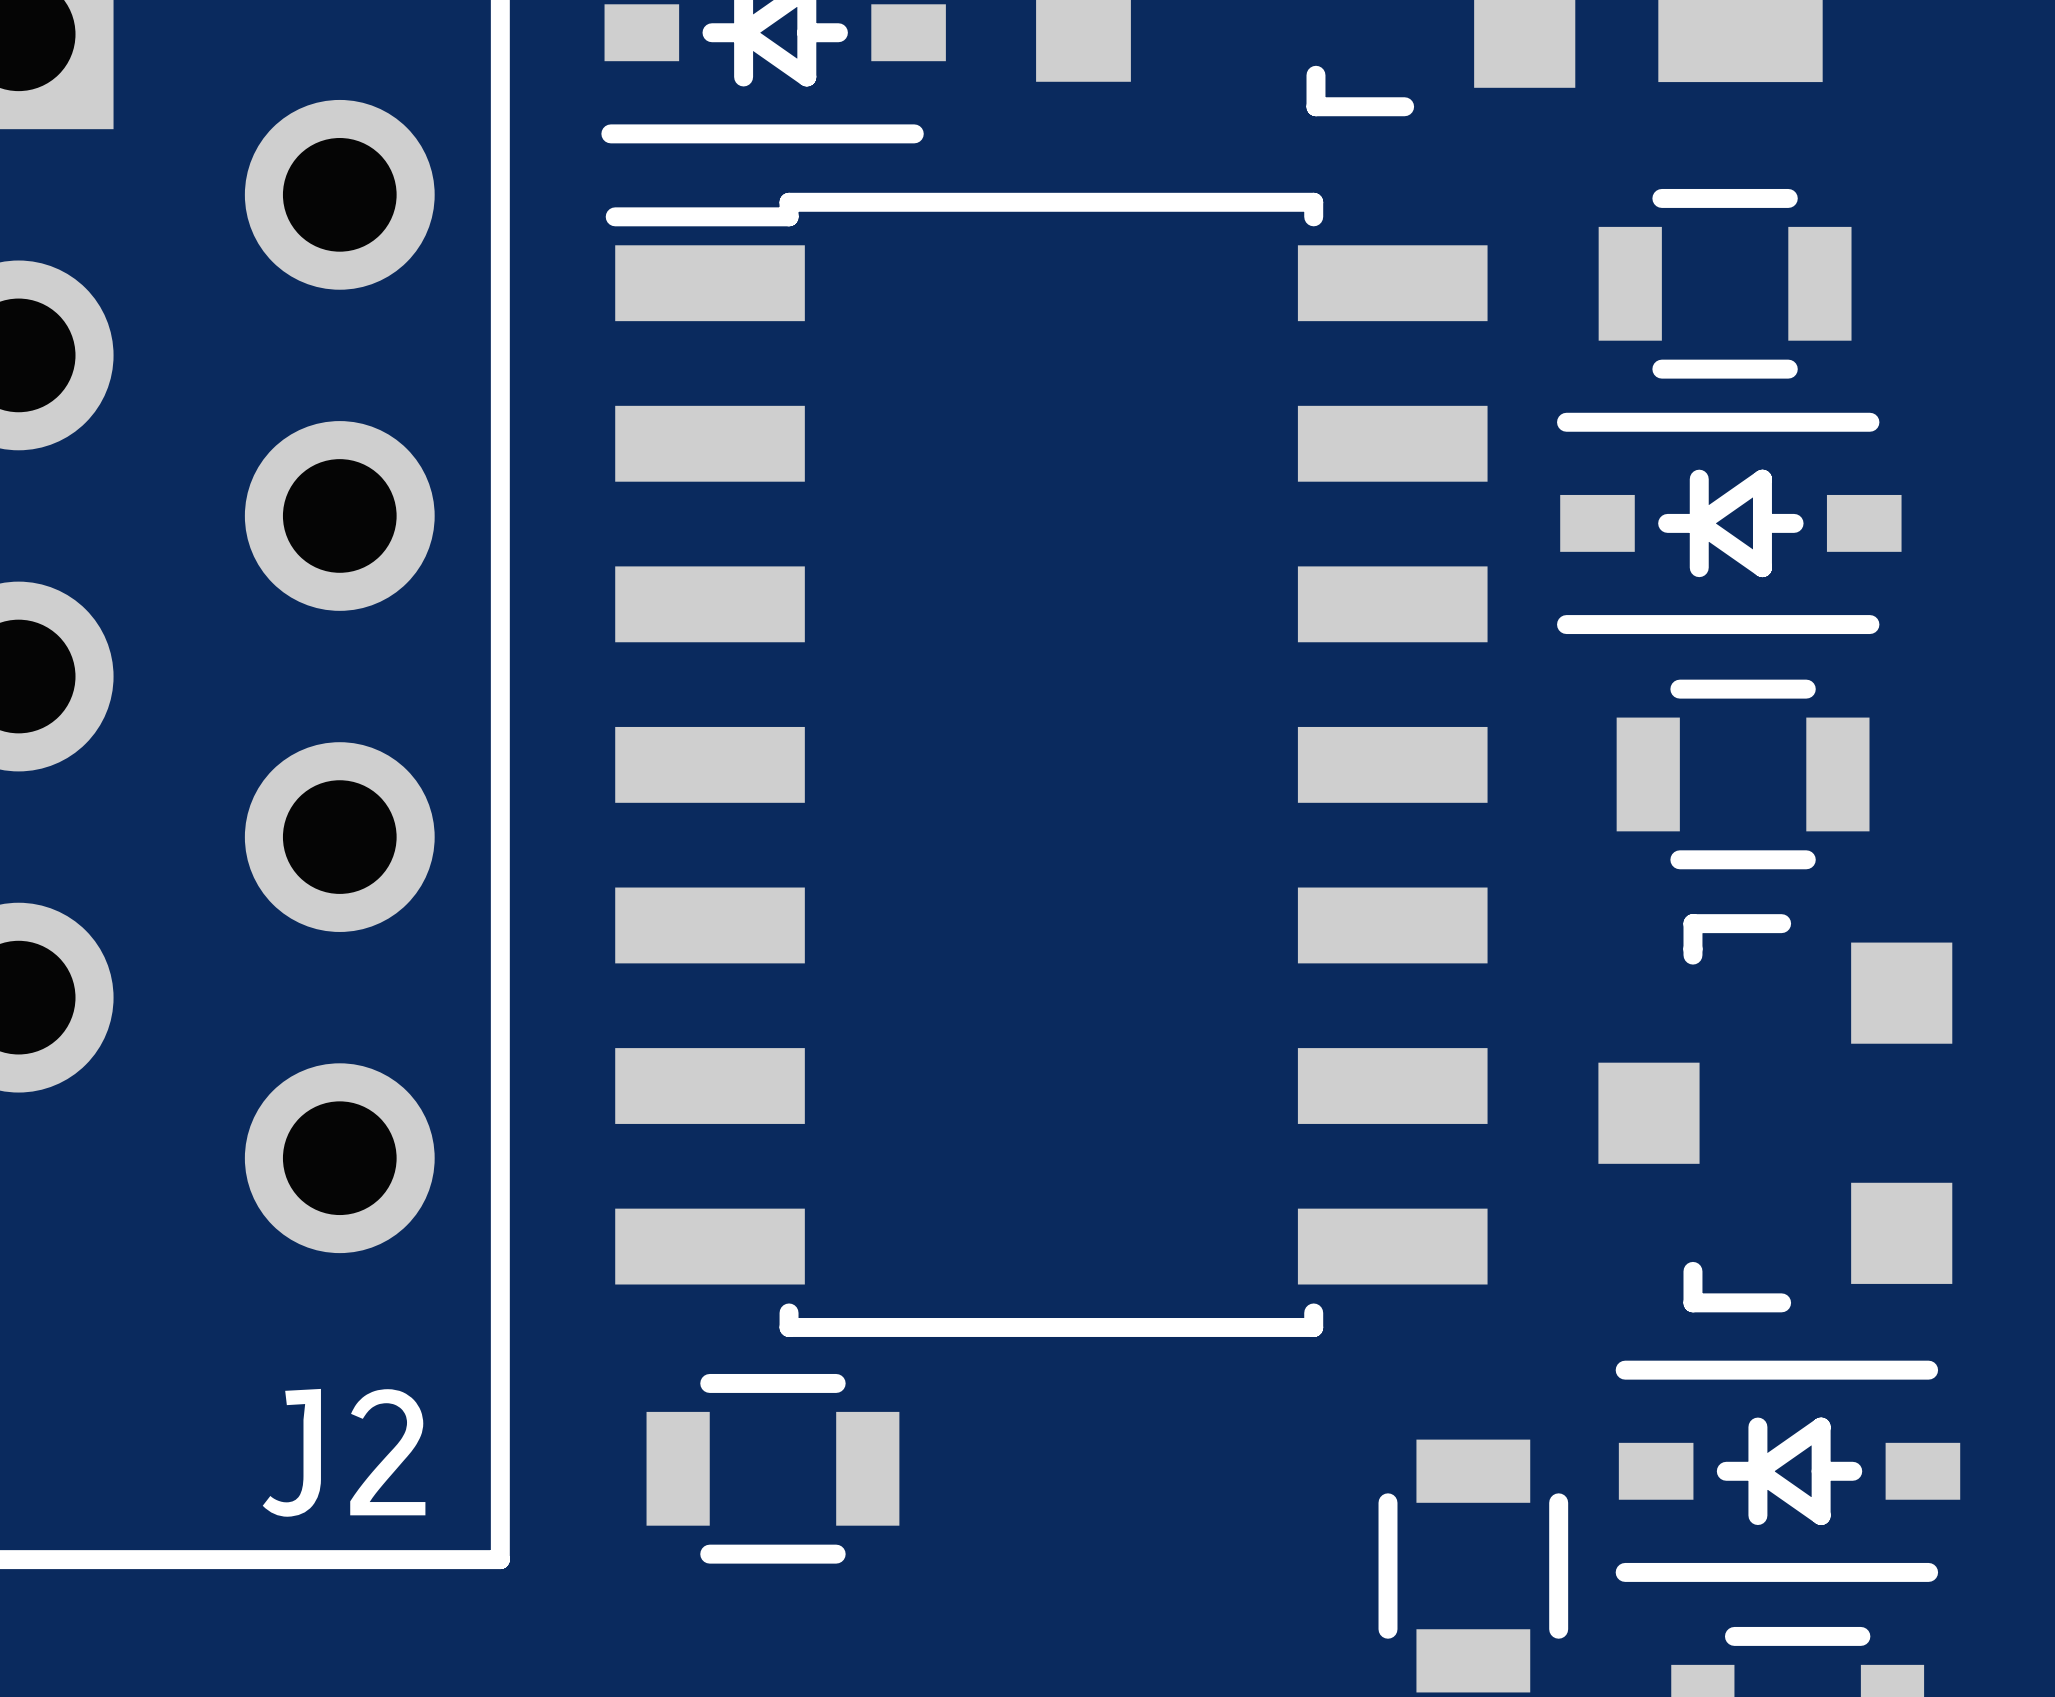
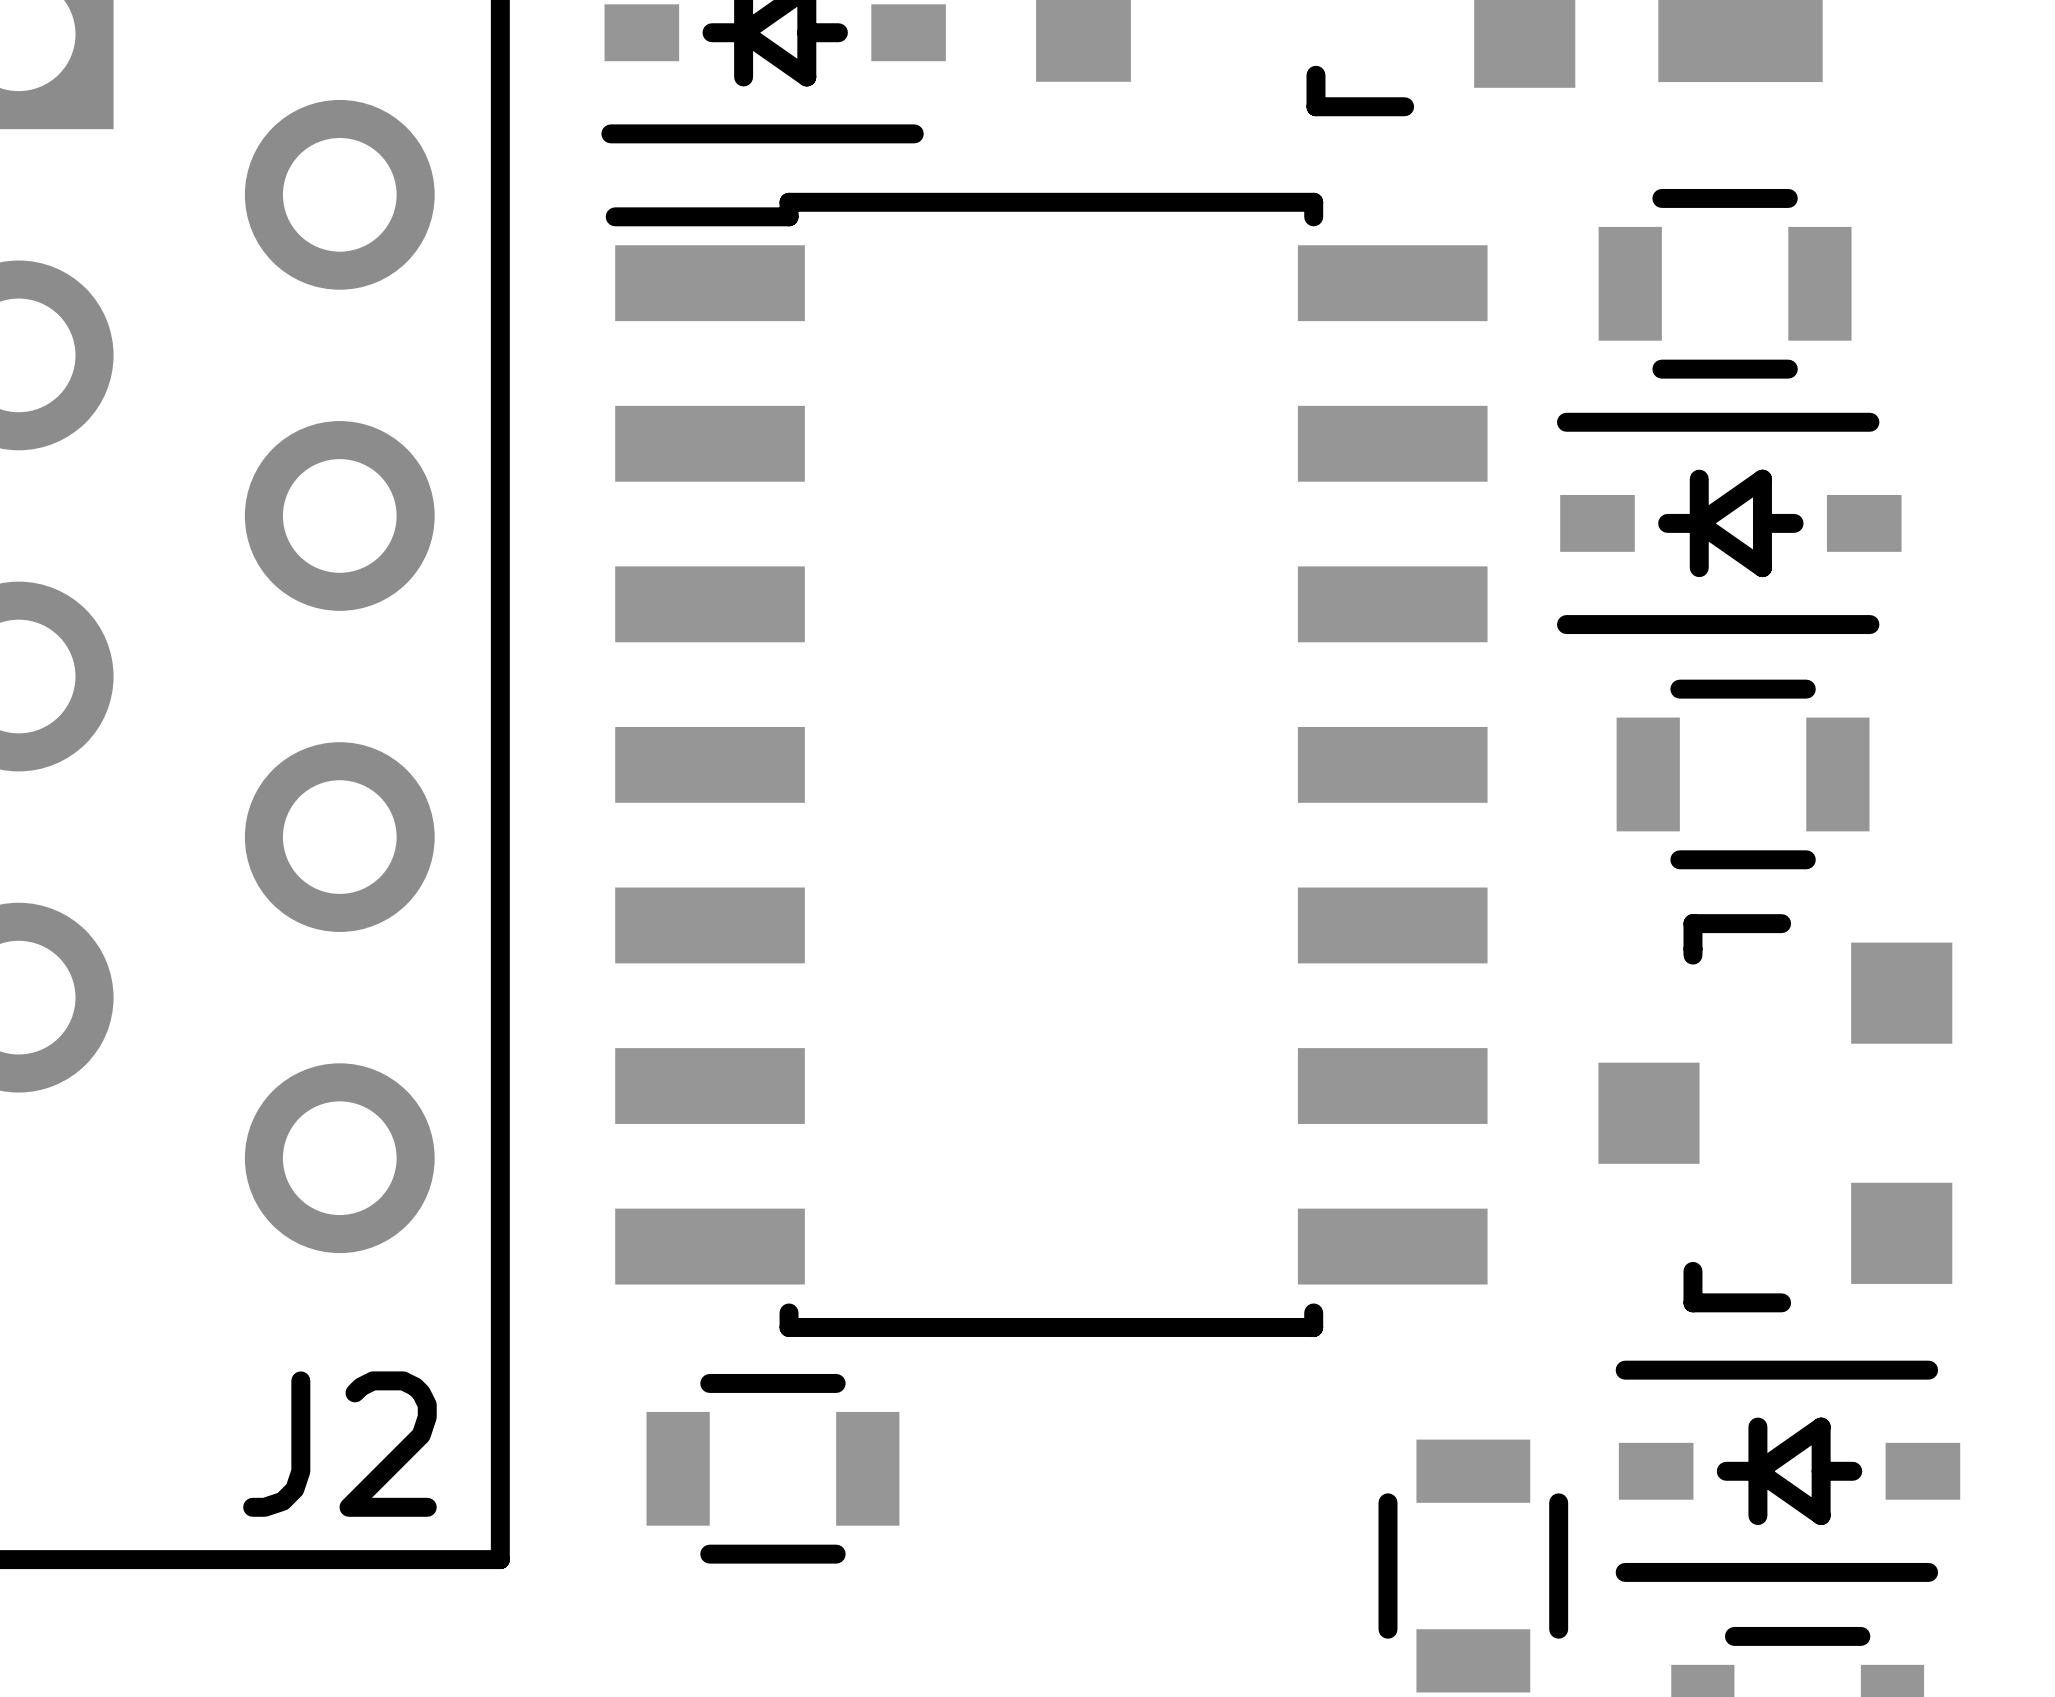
J2 name position: J2 (344, 1452) -> J2 (339, 1444)

